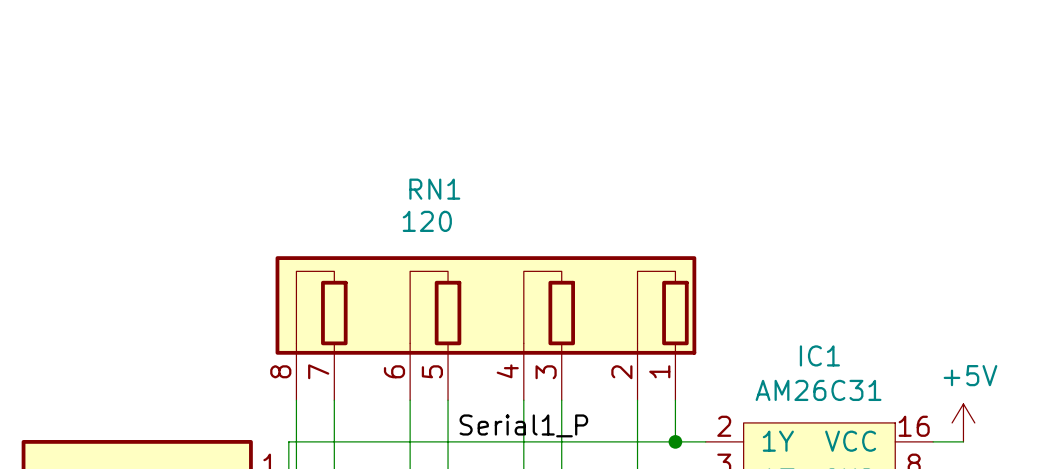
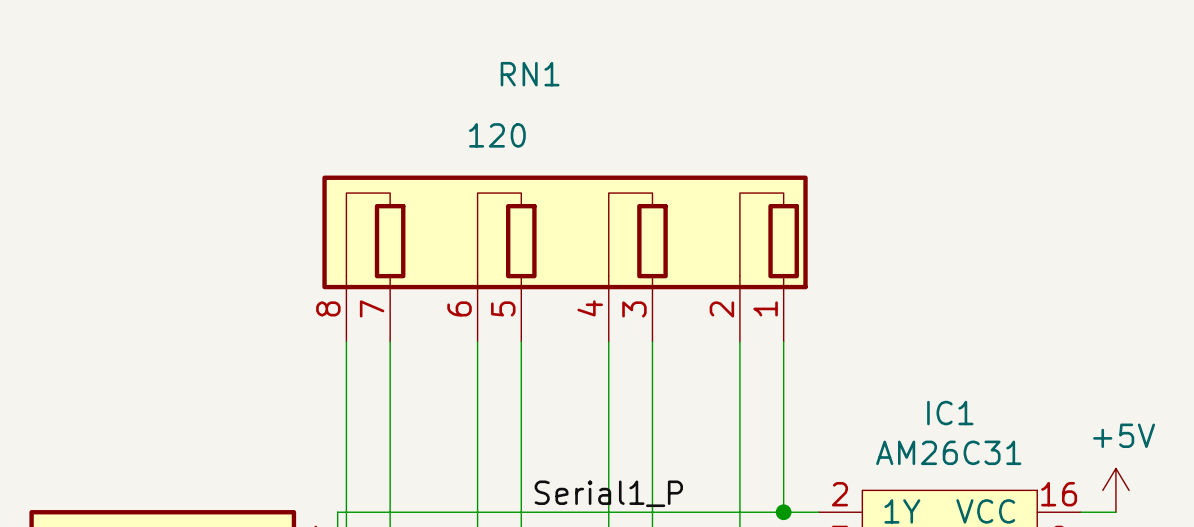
RN1 name position: RN1 (434, 189) -> RN1 (530, 74)
RN1 position: (485, 328) -> (565, 258)

